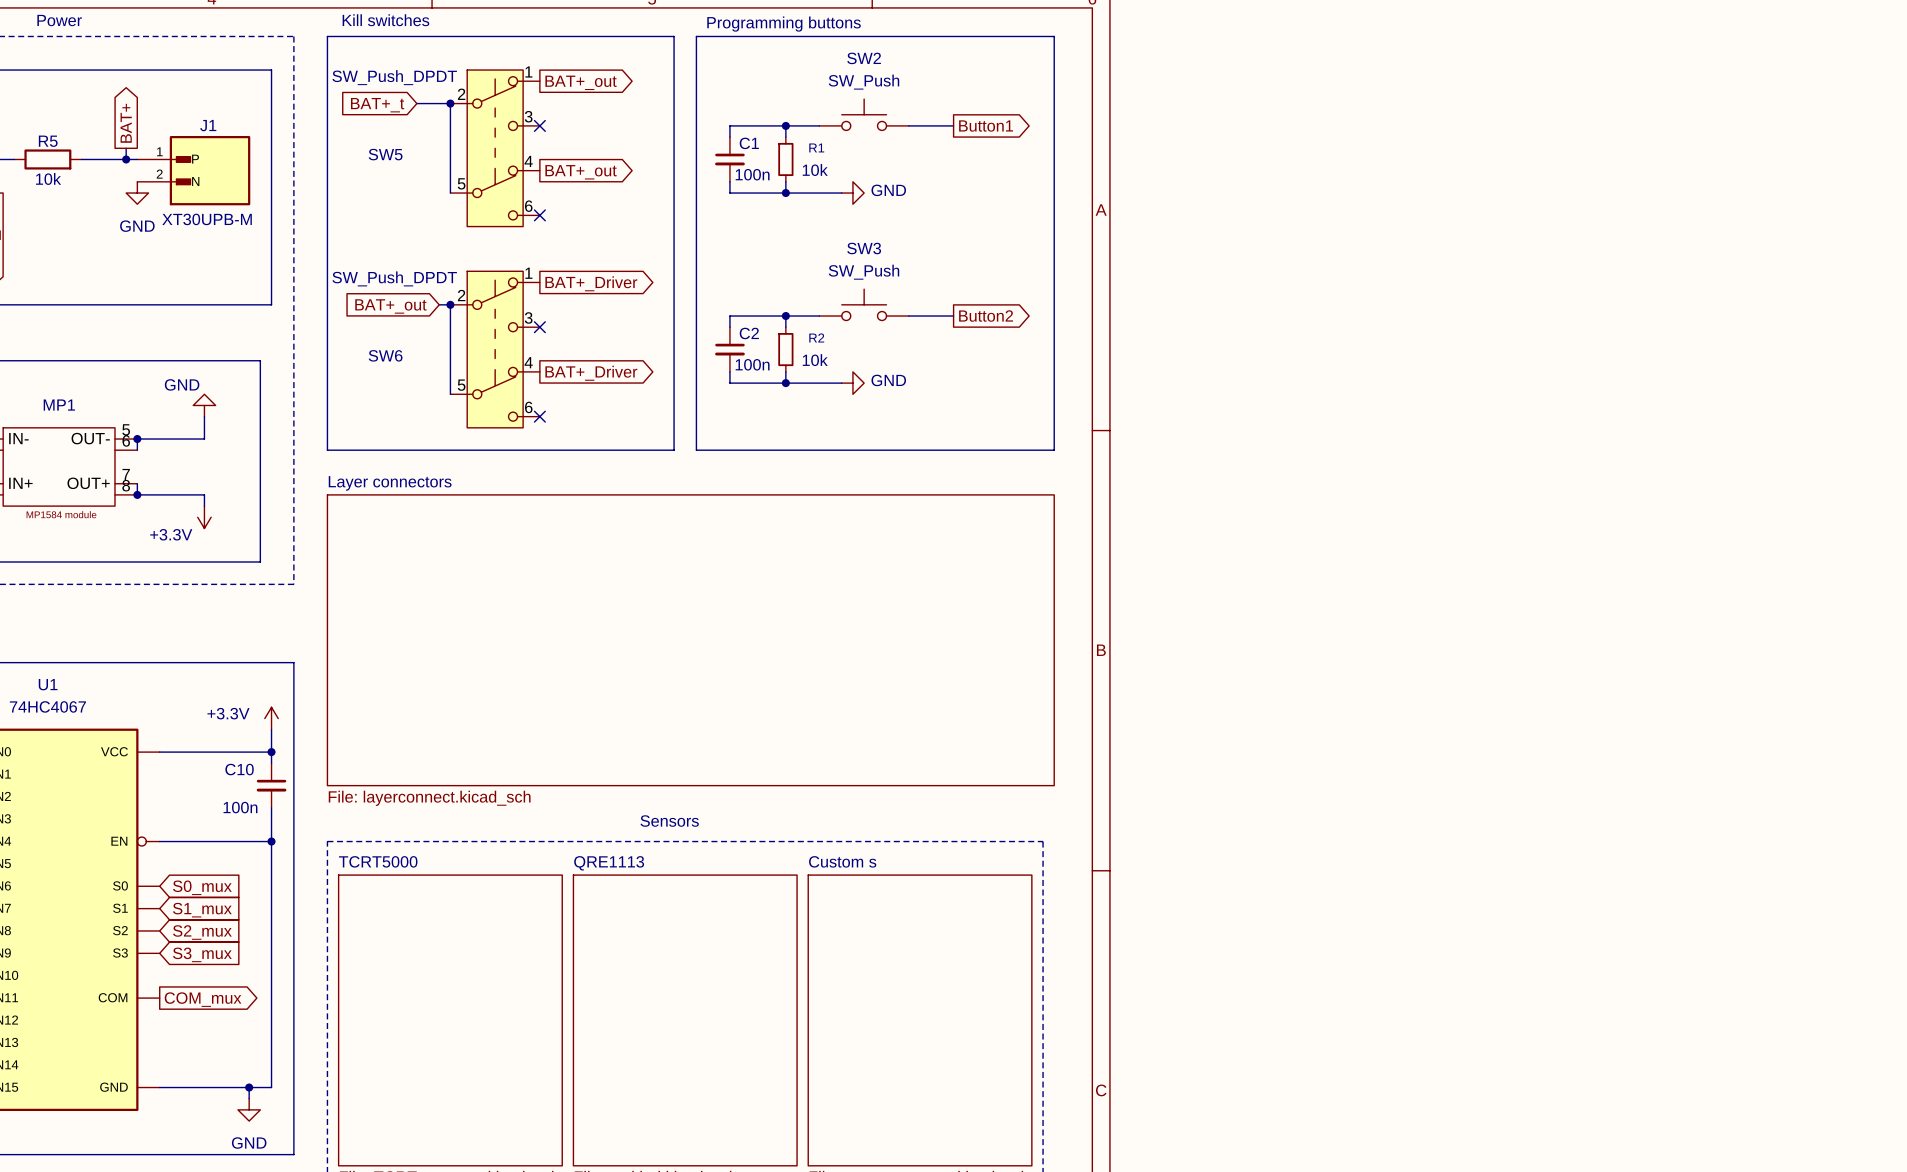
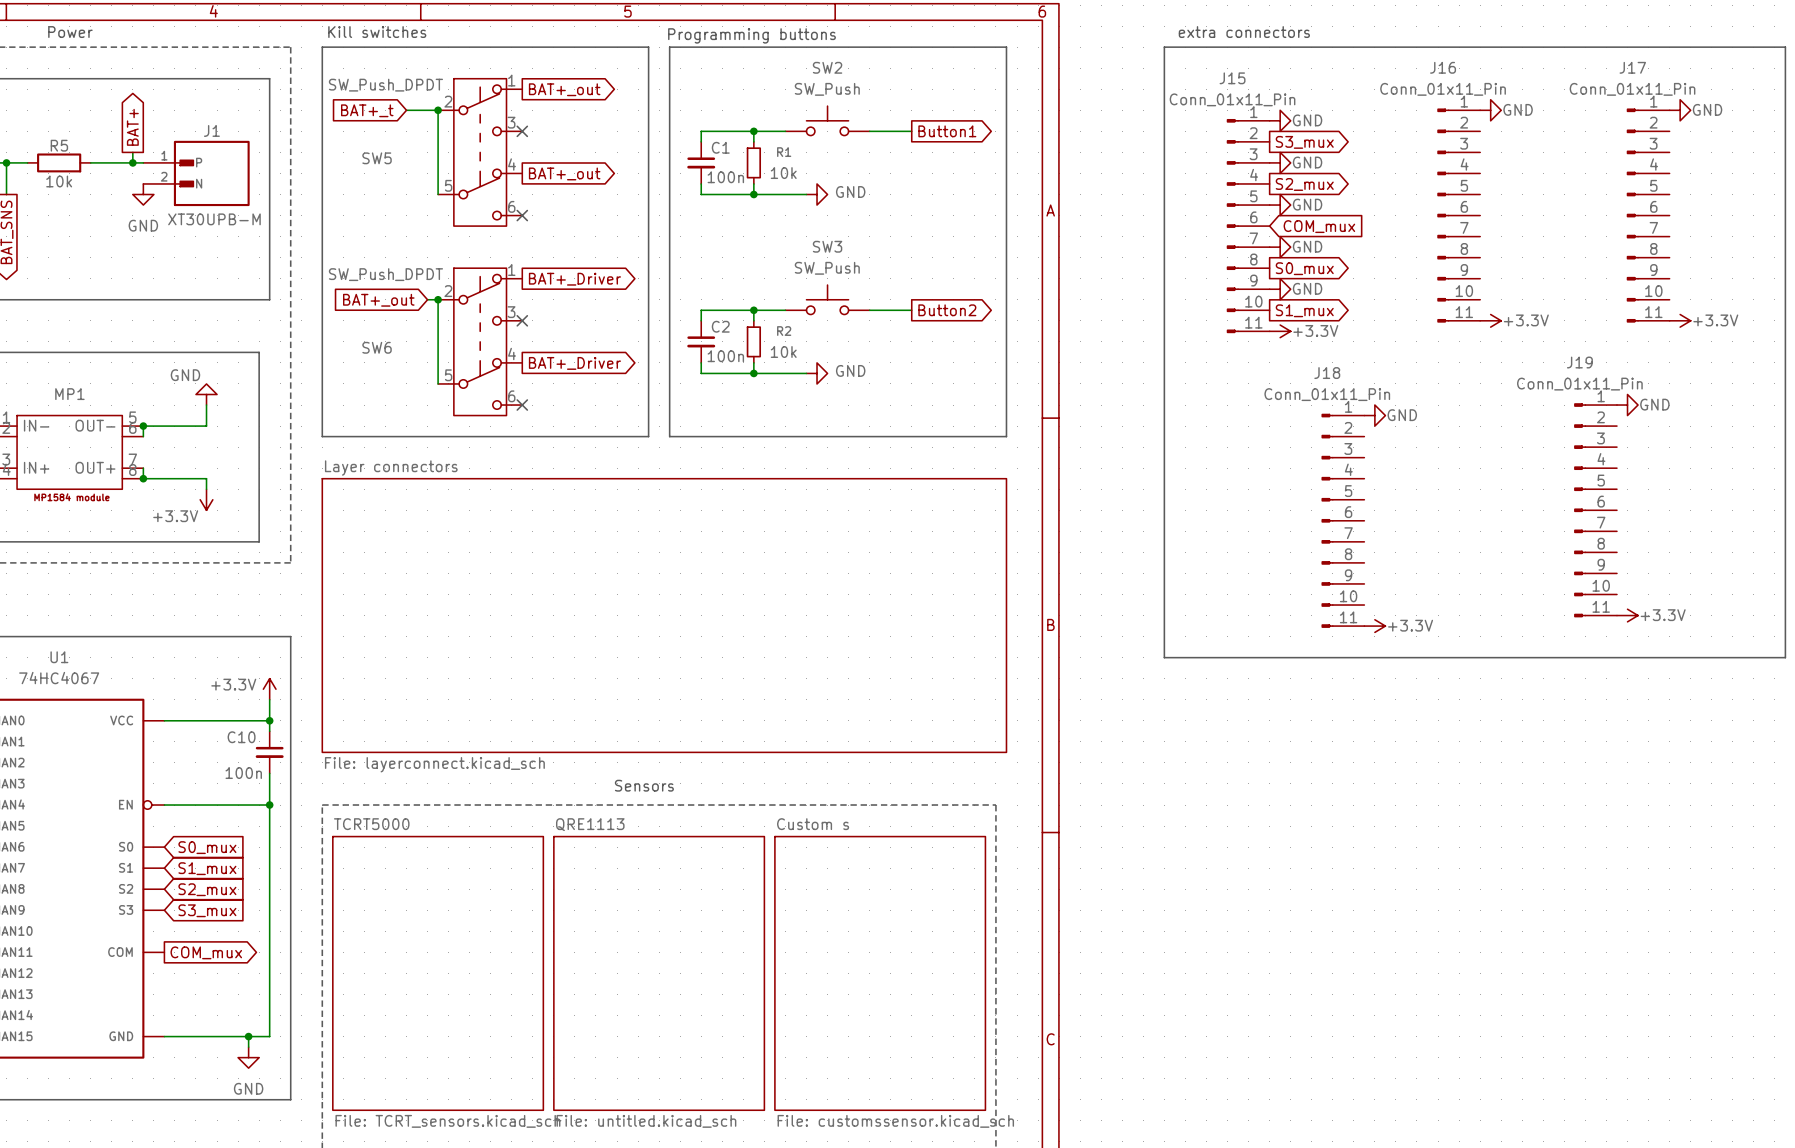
text: none -> extra connectors (1244, 32)
line: none -> (1164, 47) (1785, 47) (1785, 657) (1164, 657) (1164, 47)
power symbol: none -> GND (1490, 110)
power symbol: none -> GND (1680, 110)
power symbol: none -> GND (1280, 120)
global label: none -> S3_mux (1304, 142)
power symbol: none -> GND (1280, 162)
global label: none -> S2_mux (1304, 184)
power symbol: none -> GND (1280, 205)
J16: none -> Conn_01x11_Pin (1458, 215)
J17: none -> Conn_01x11_Pin (1648, 215)
J15: none -> Conn_01x11_Pin (1248, 226)
global label: none -> COM_mux (1319, 226)
power symbol: none -> GND (1280, 247)
global label: none -> S0_mux (1304, 268)
power symbol: none -> GND (1280, 289)
global label: none -> S1_mux (1304, 310)
power symbol: none -> +3.3V (1490, 320)
power symbol: none -> +3.3V (1680, 320)
power symbol: none -> +3.3V (1280, 331)
power symbol: none -> GND (1627, 405)
power symbol: none -> GND (1374, 415)
J19: none -> Conn_01x11_Pin (1595, 510)
J18: none -> Conn_01x11_Pin (1342, 520)
power symbol: none -> +3.3V (1627, 615)
power symbol: none -> +3.3V (1374, 626)

